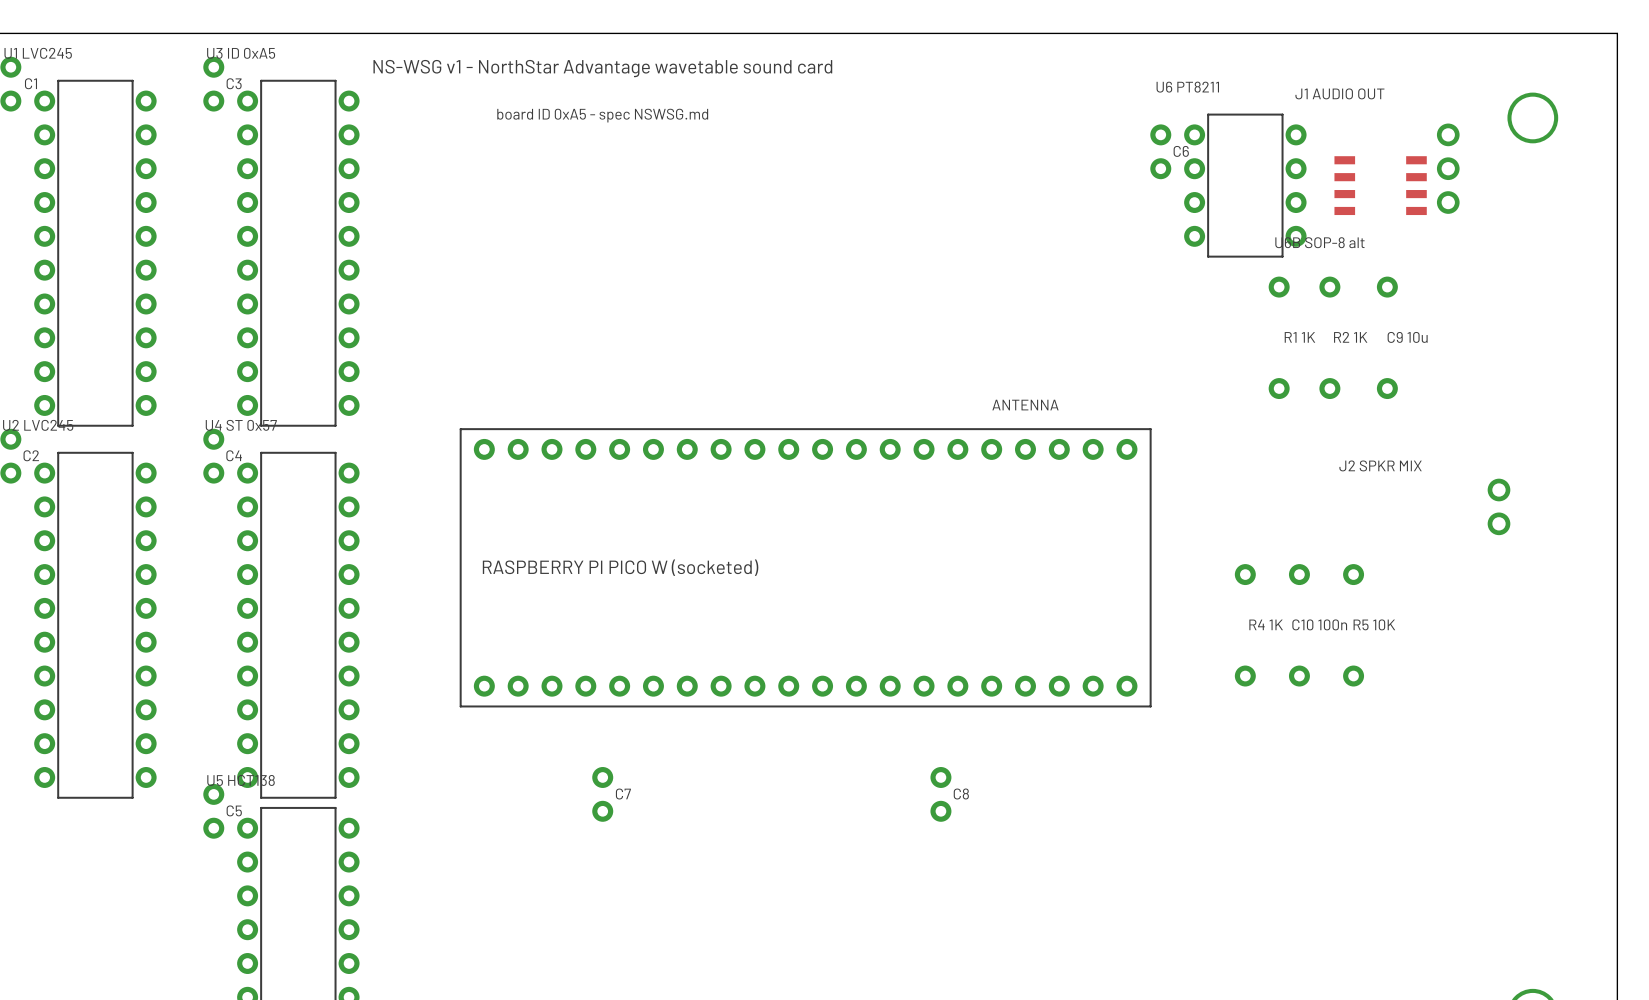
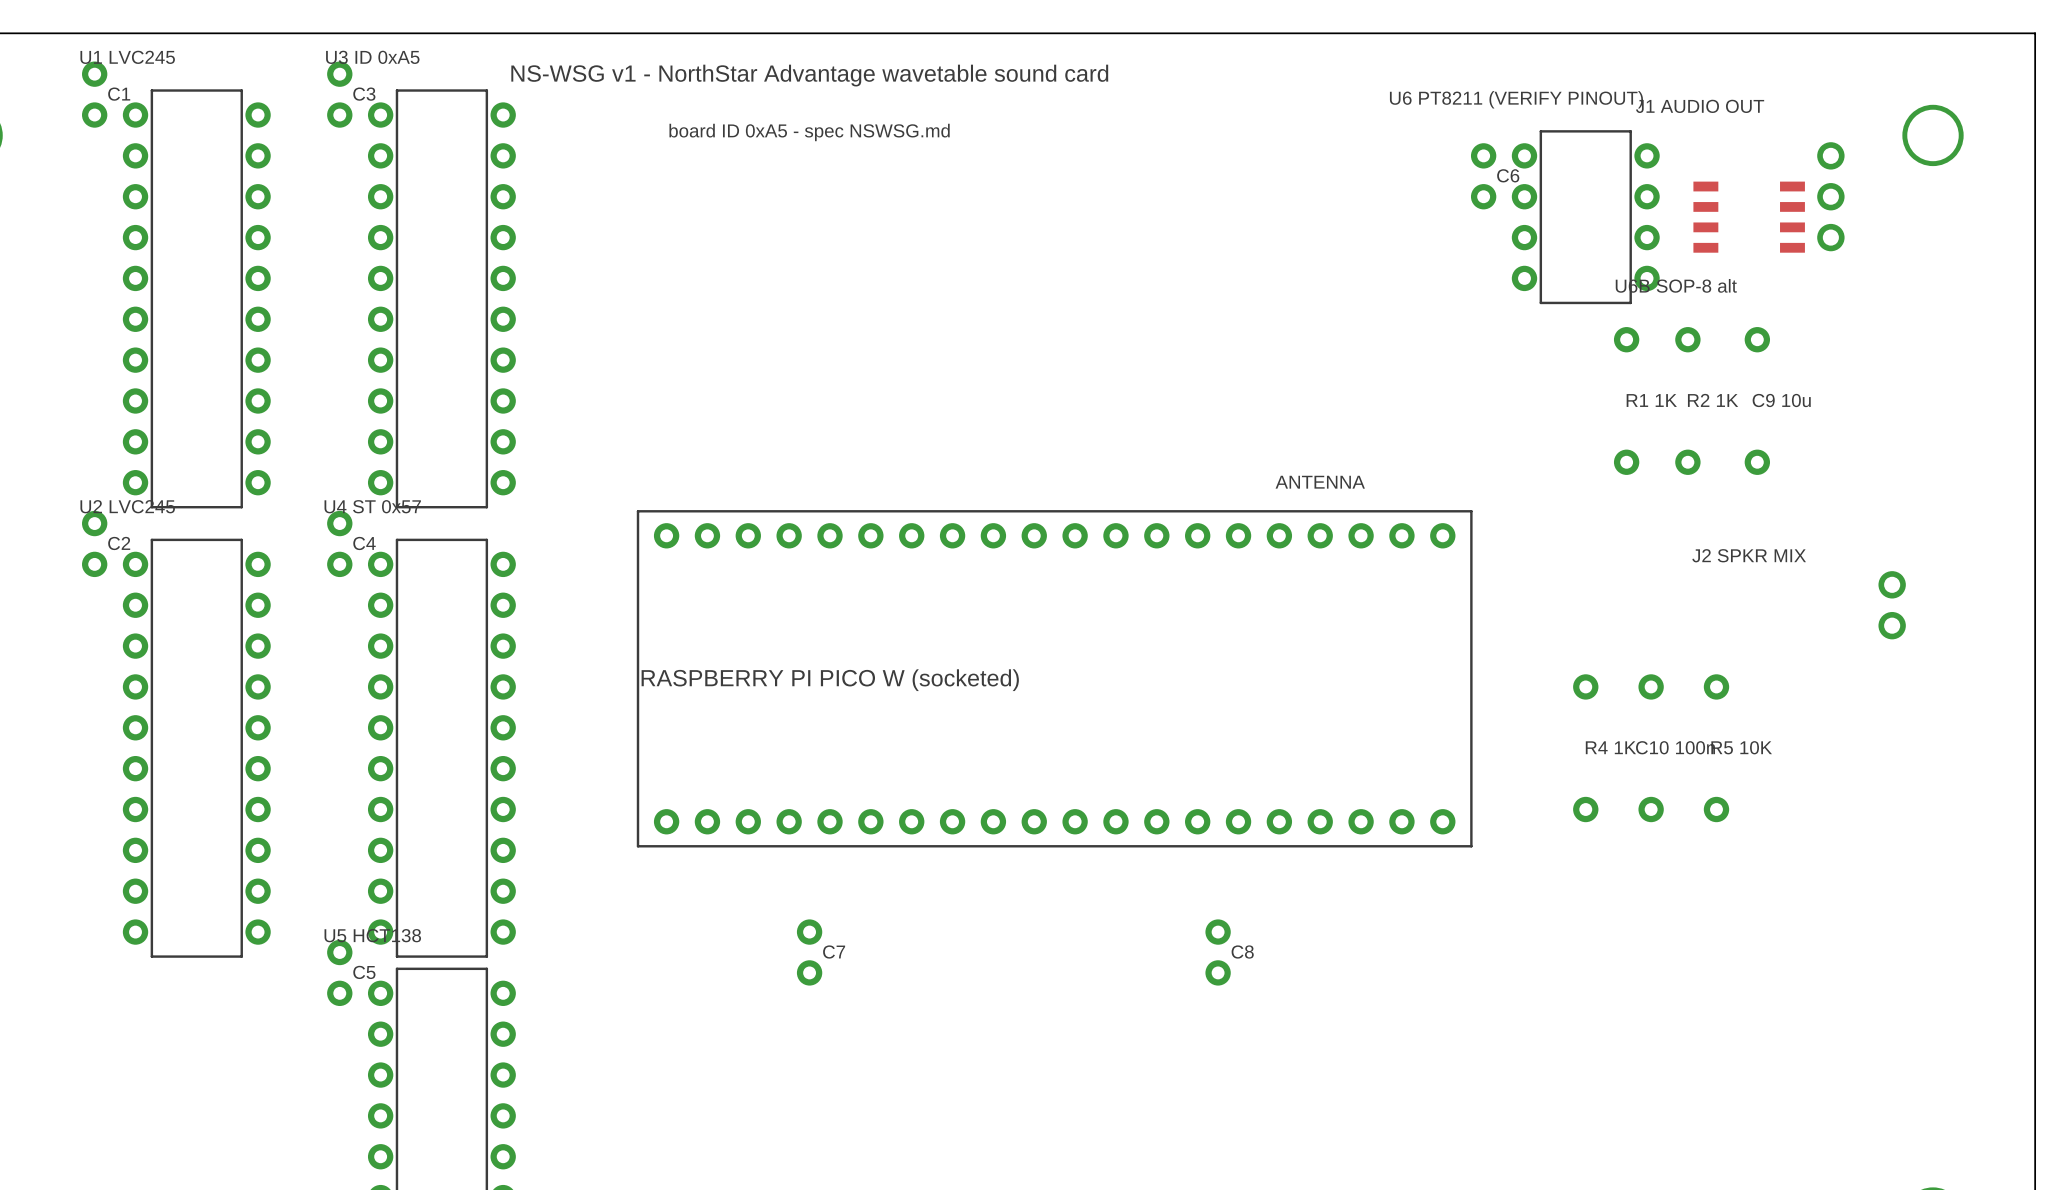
text: U6 PT8211 (1187, 87) -> U6 PT8211 (VERIFY PINOUT) (1516, 99)

